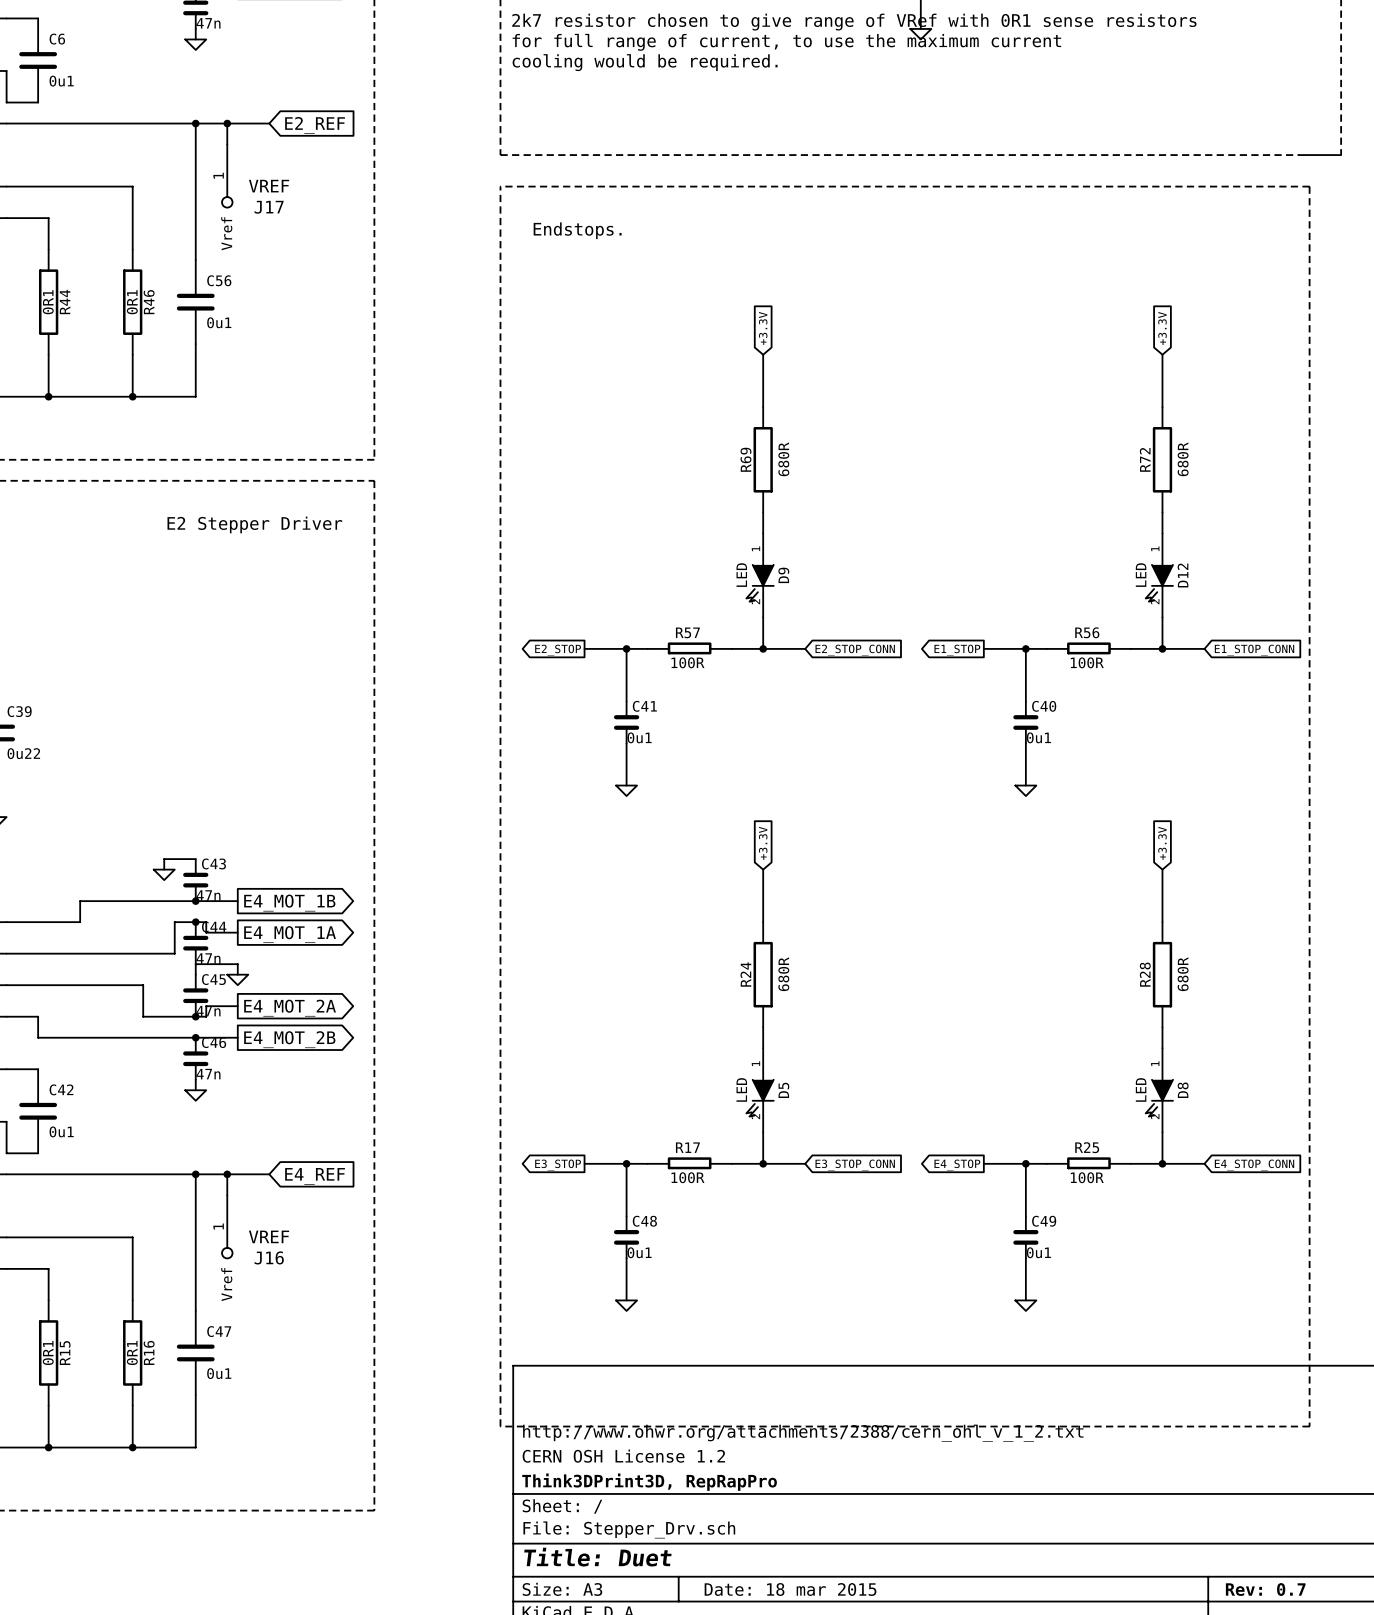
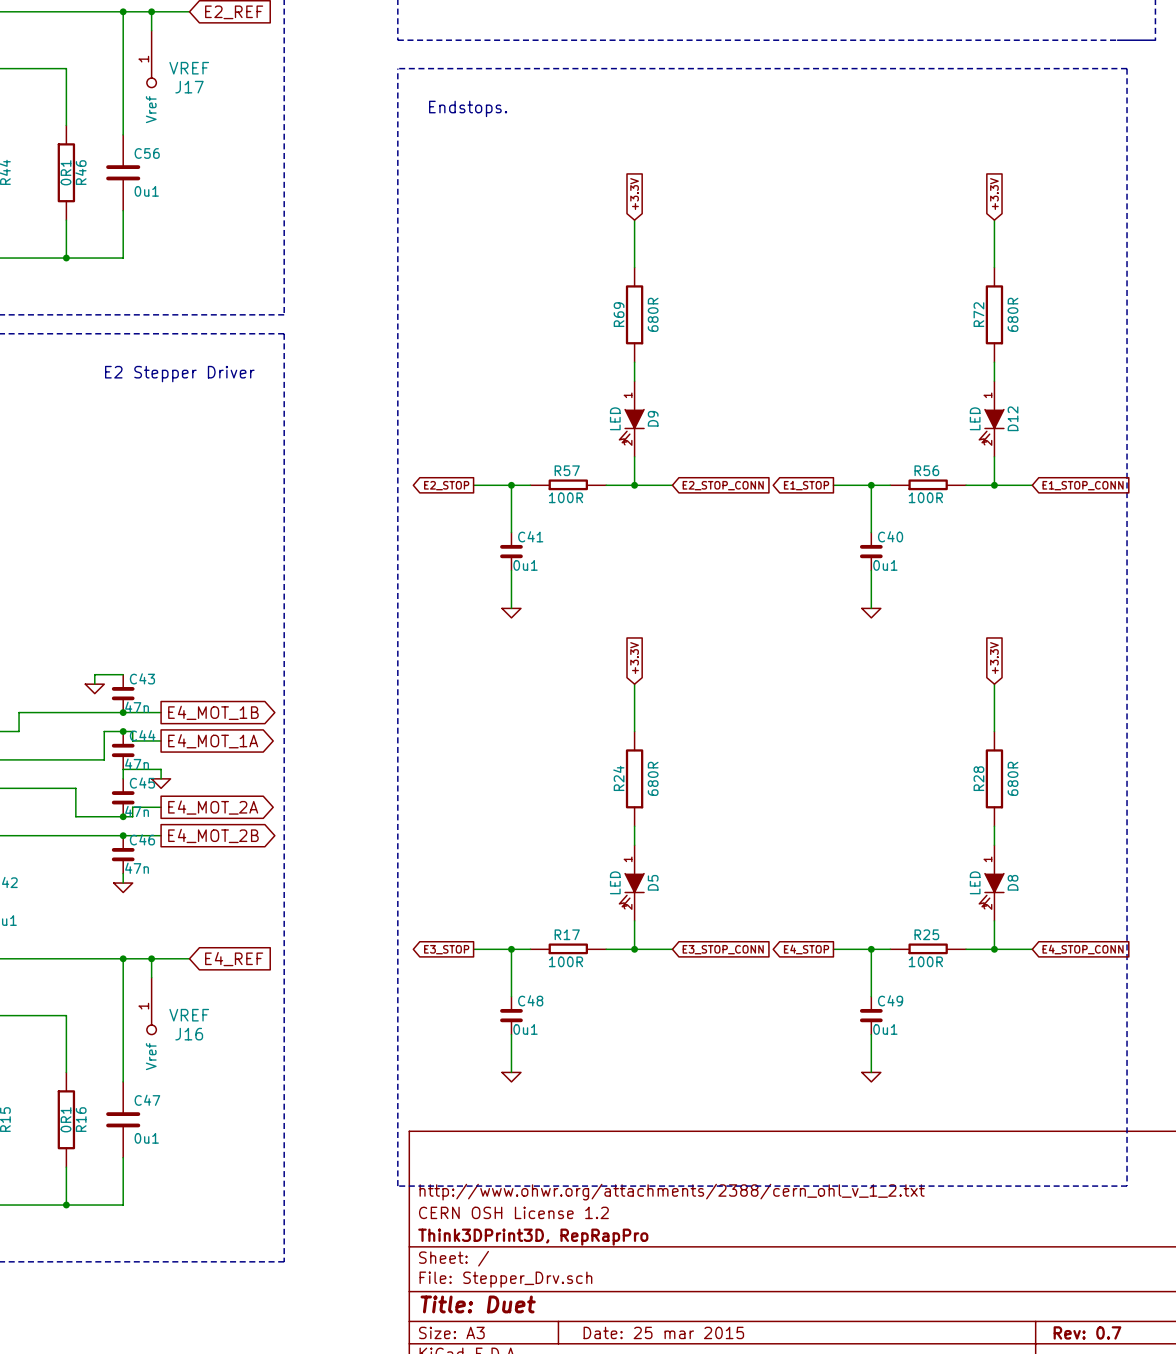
title block: Date: 18 mar 2015 (790, 1589) -> Date: 25 mar 2015 (663, 1332)

